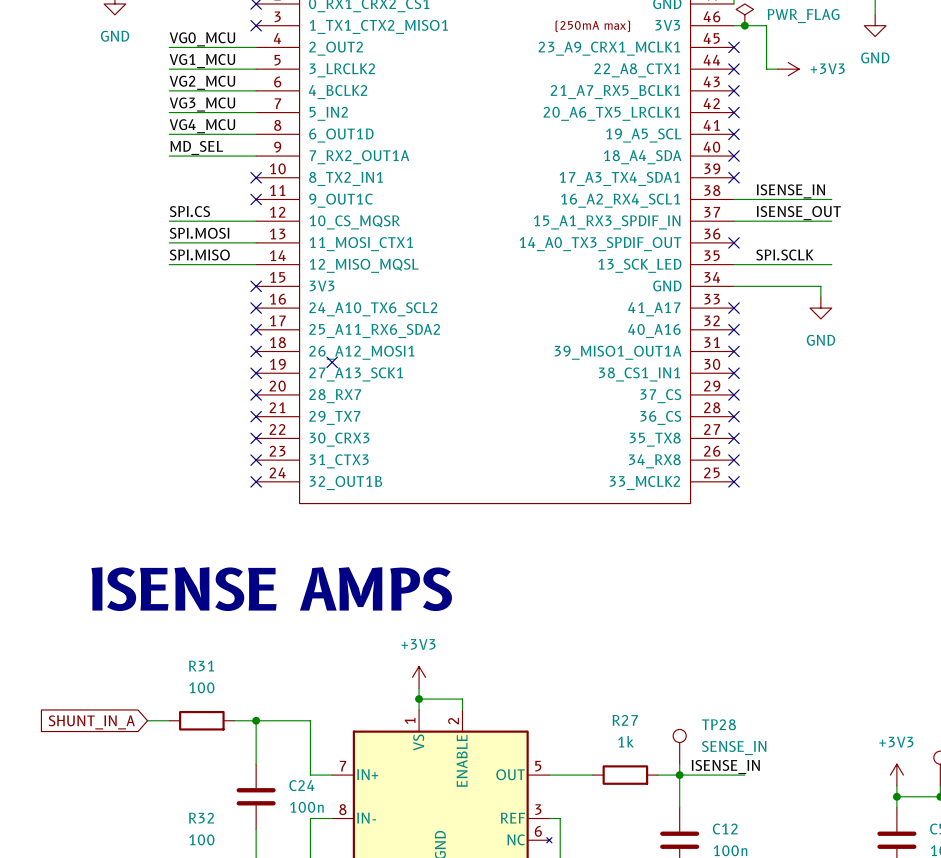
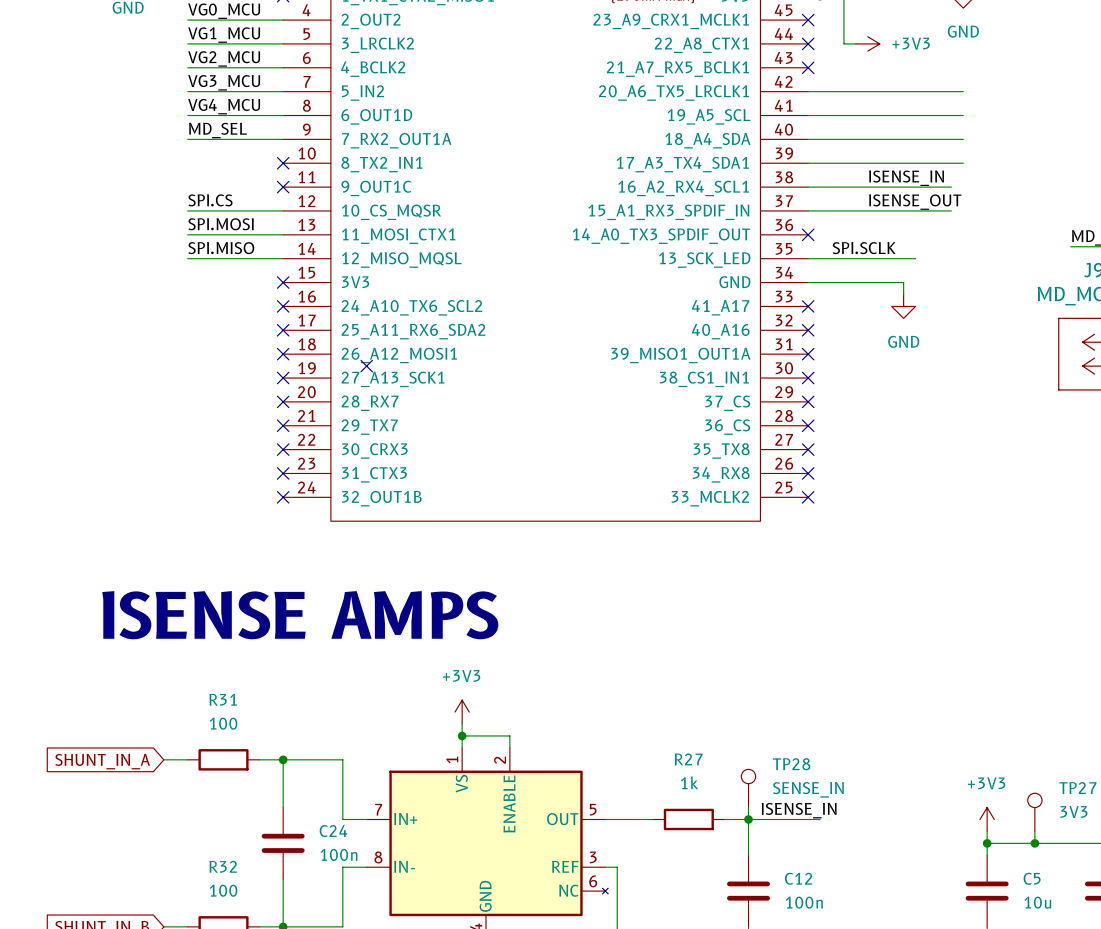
wire: none -> (808, 91) (963, 91)
no-connect mark: (733, 112) -> none
wire: none -> (808, 115) (963, 115)
no-connect mark: (733, 134) -> none
wire: none -> (808, 139) (963, 139)
no-connect mark: (733, 156) -> none
wire: none -> (808, 163) (963, 163)
no-connect mark: (733, 177) -> none
label position: ISENSE_IN (790, 191) -> ISENSE_IN (906, 178)
wire: none -> (915, 187) (951, 187)
label position: ISENSE_OUT (798, 213) -> ISENSE_OUT (915, 202)
wire: none -> (915, 210) (951, 210)

